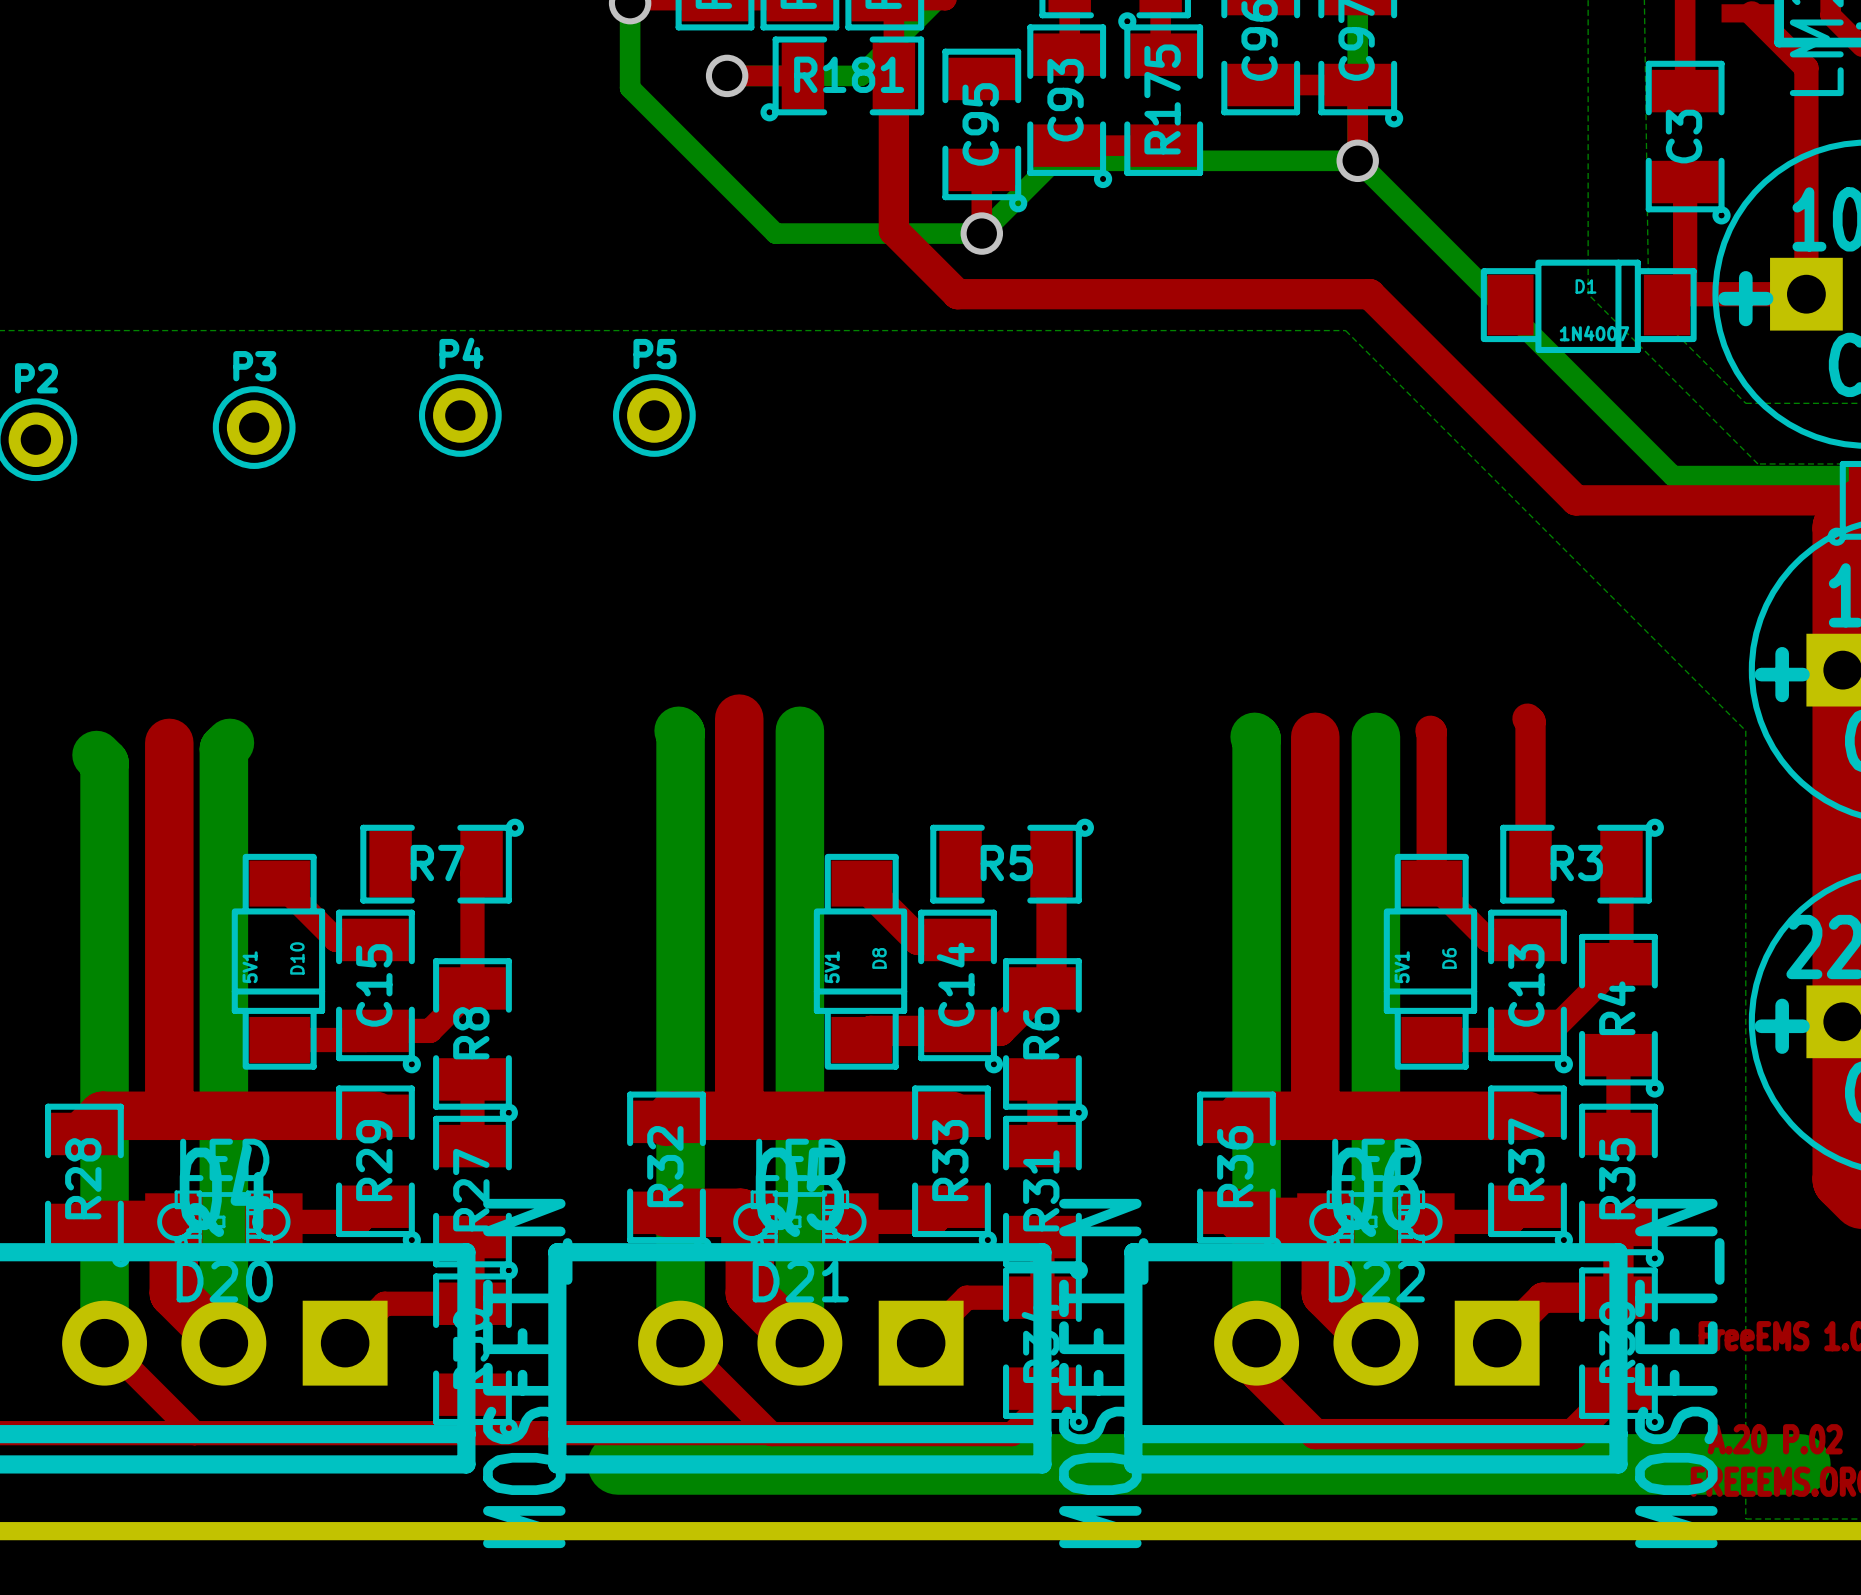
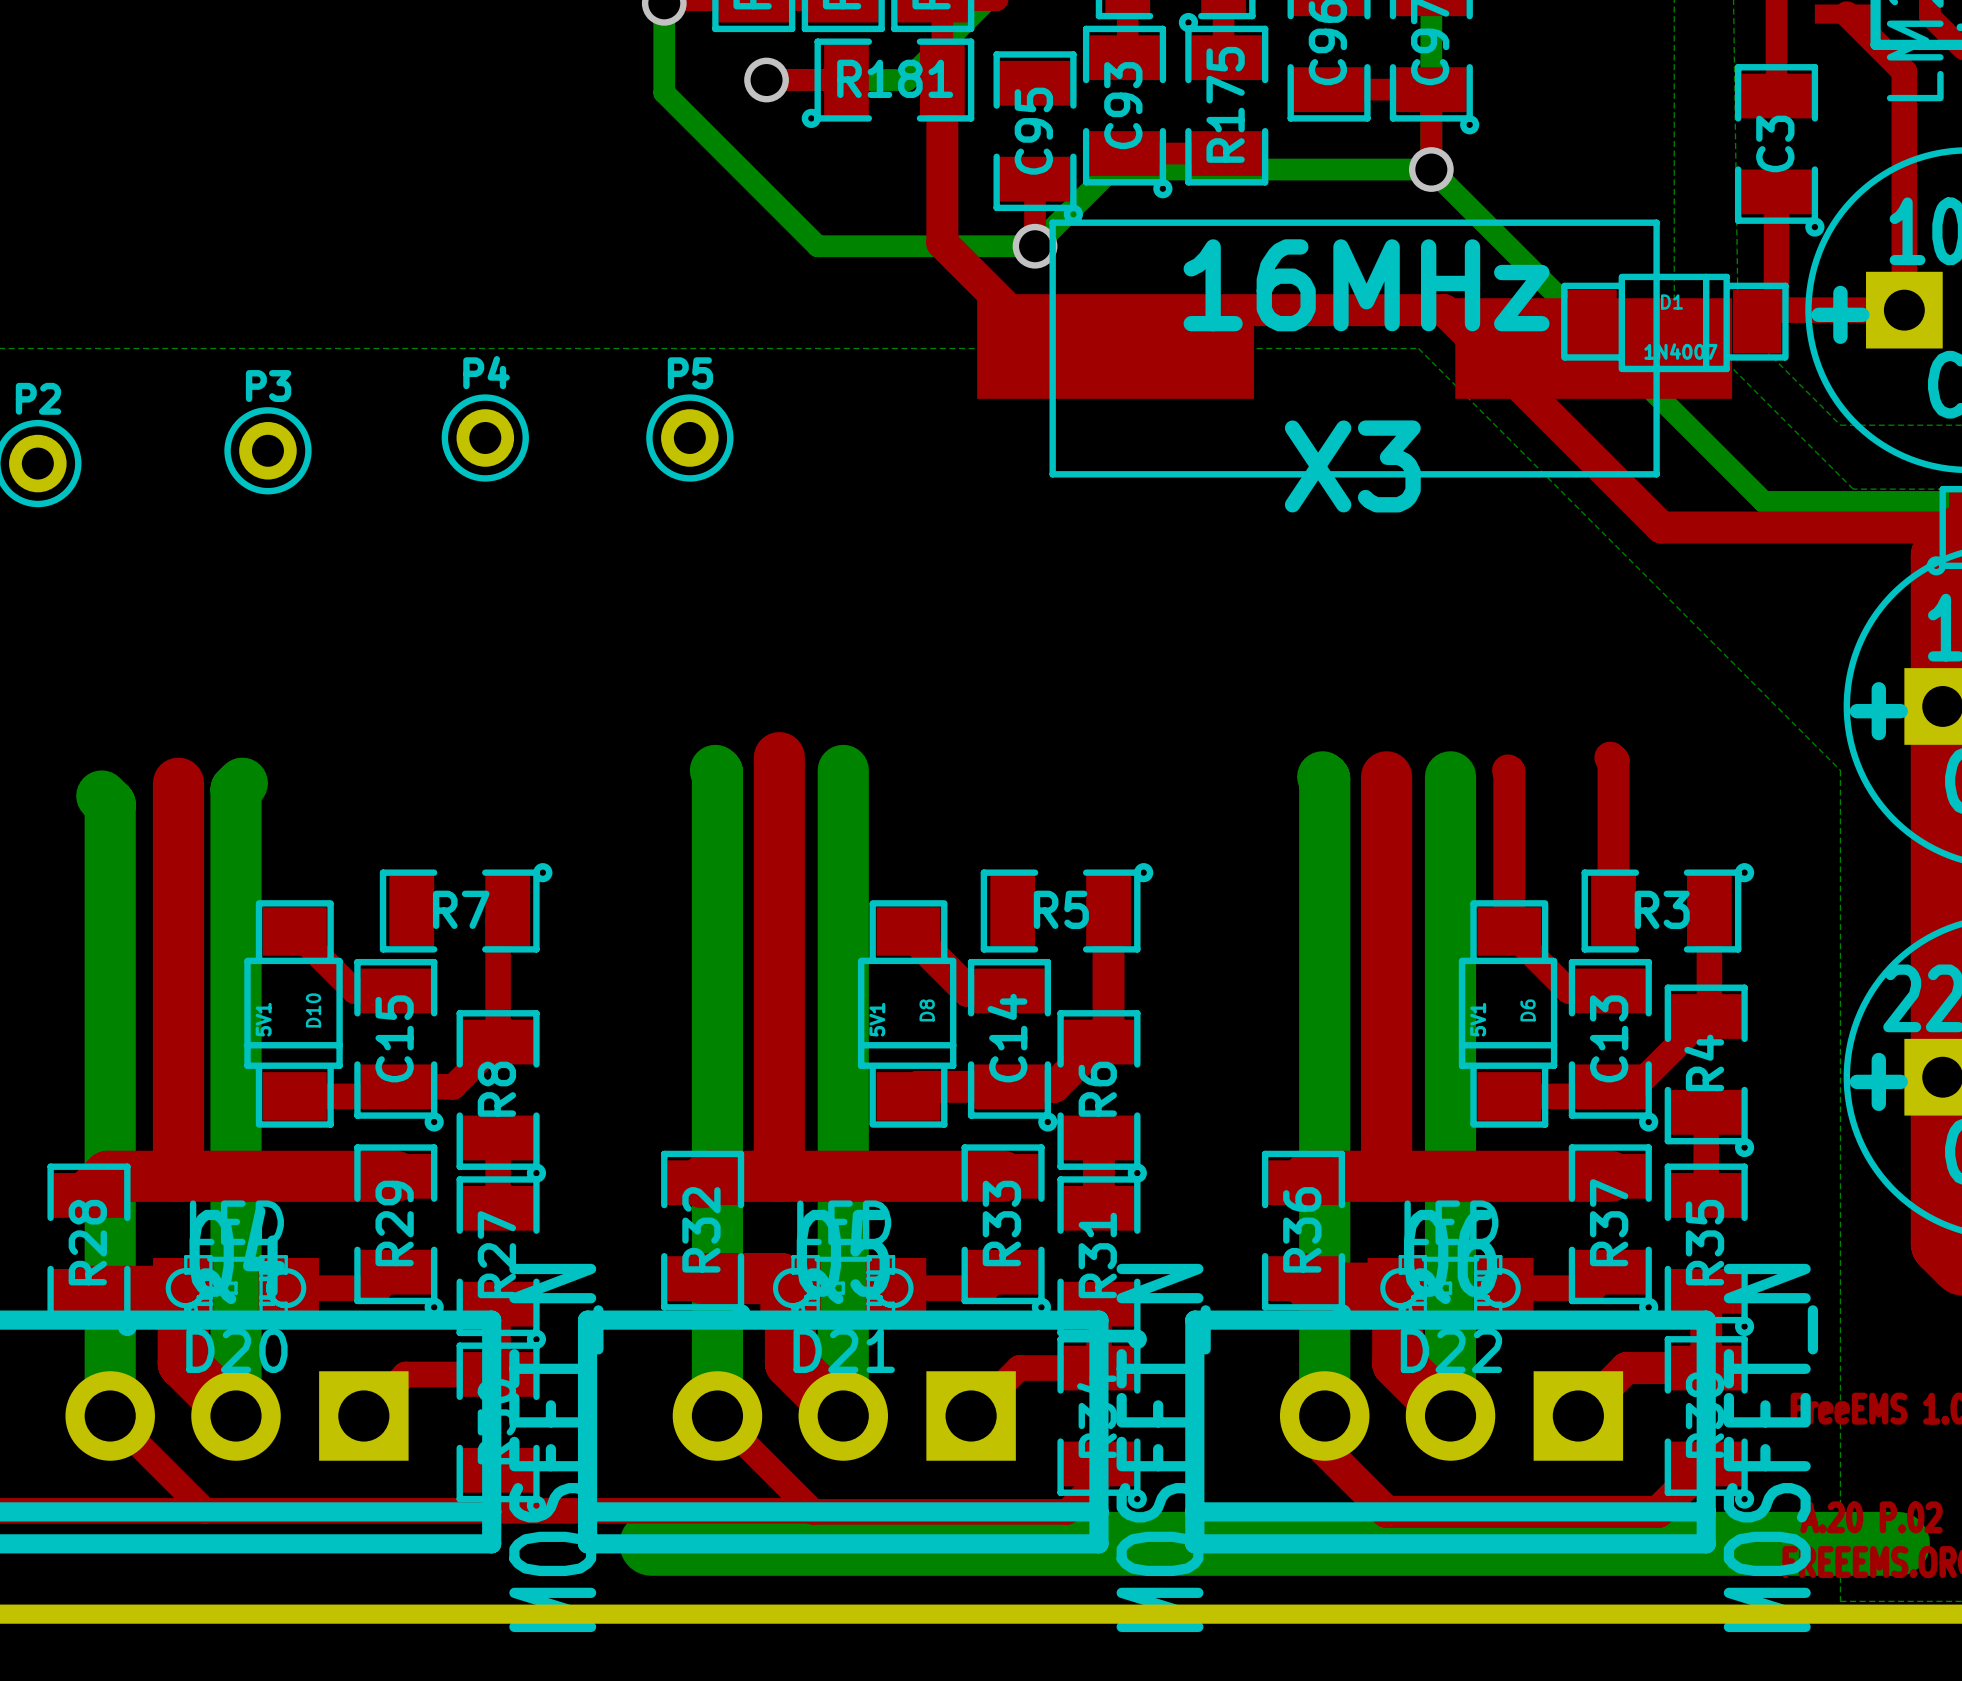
X3: none -> 16MHz (1354, 348)

